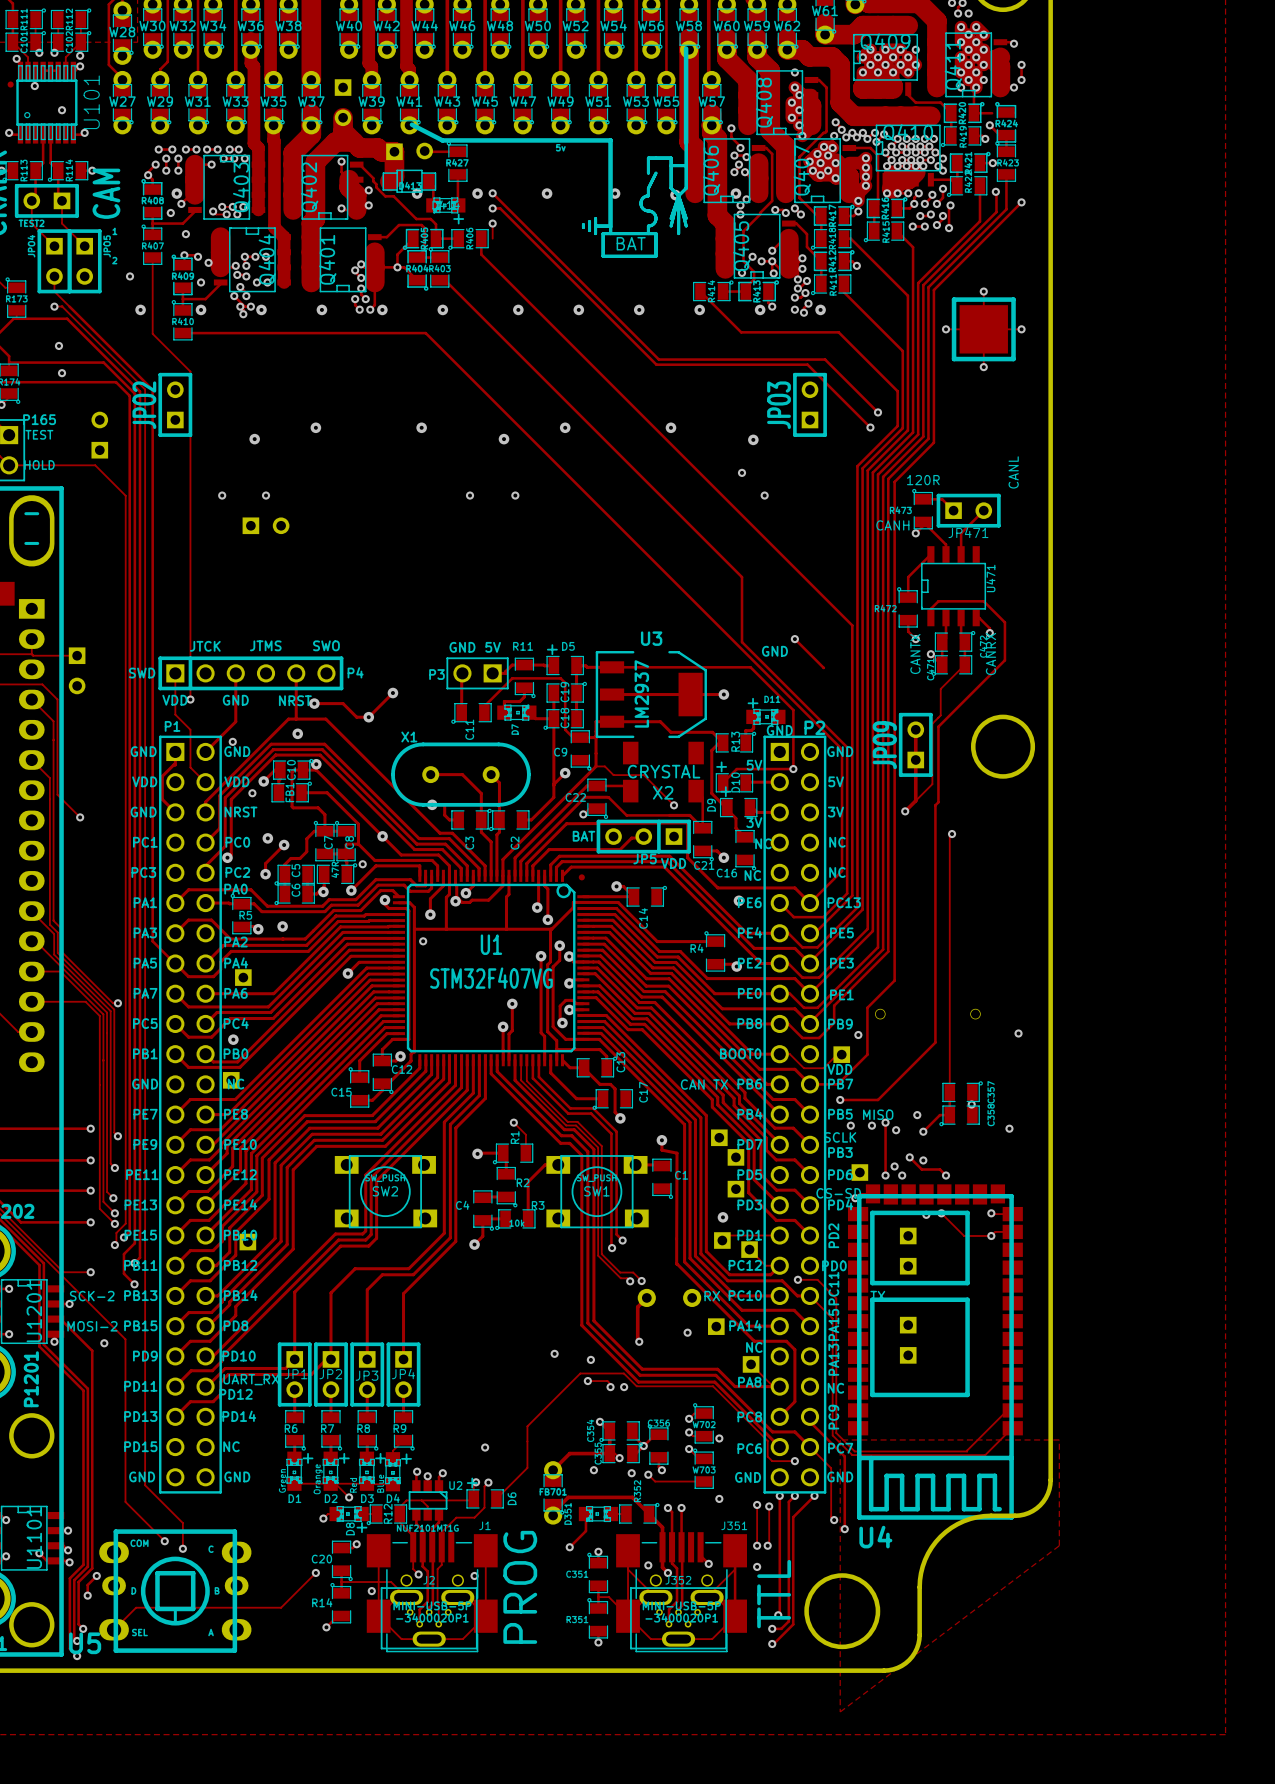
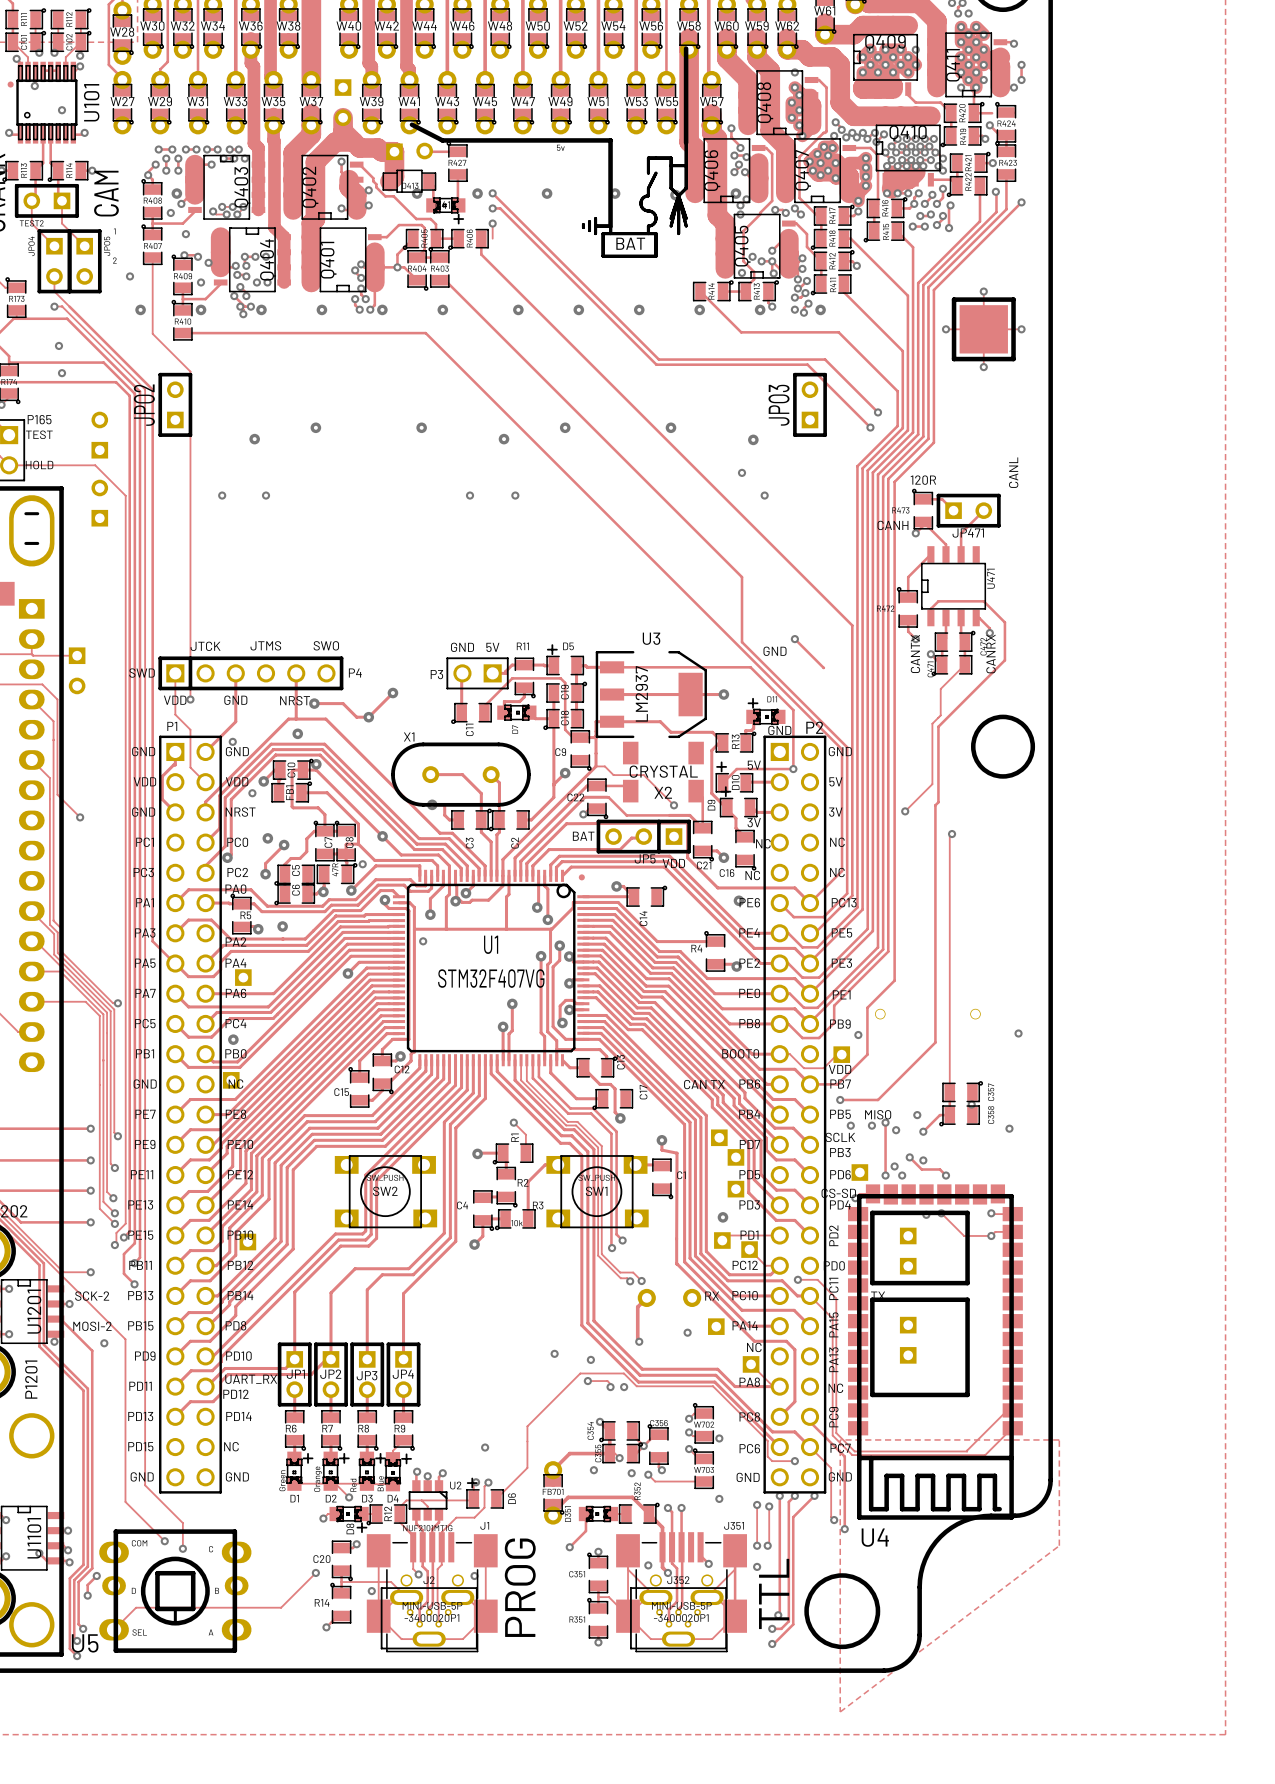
part rotation: 0° (266, 525) -> 90° counterclockwise (99, 503)
part position: (266, 525) -> (99, 503)
track: (915, 729) (915, 800) (905, 811) -> none
JPO9: (915, 744) -> none

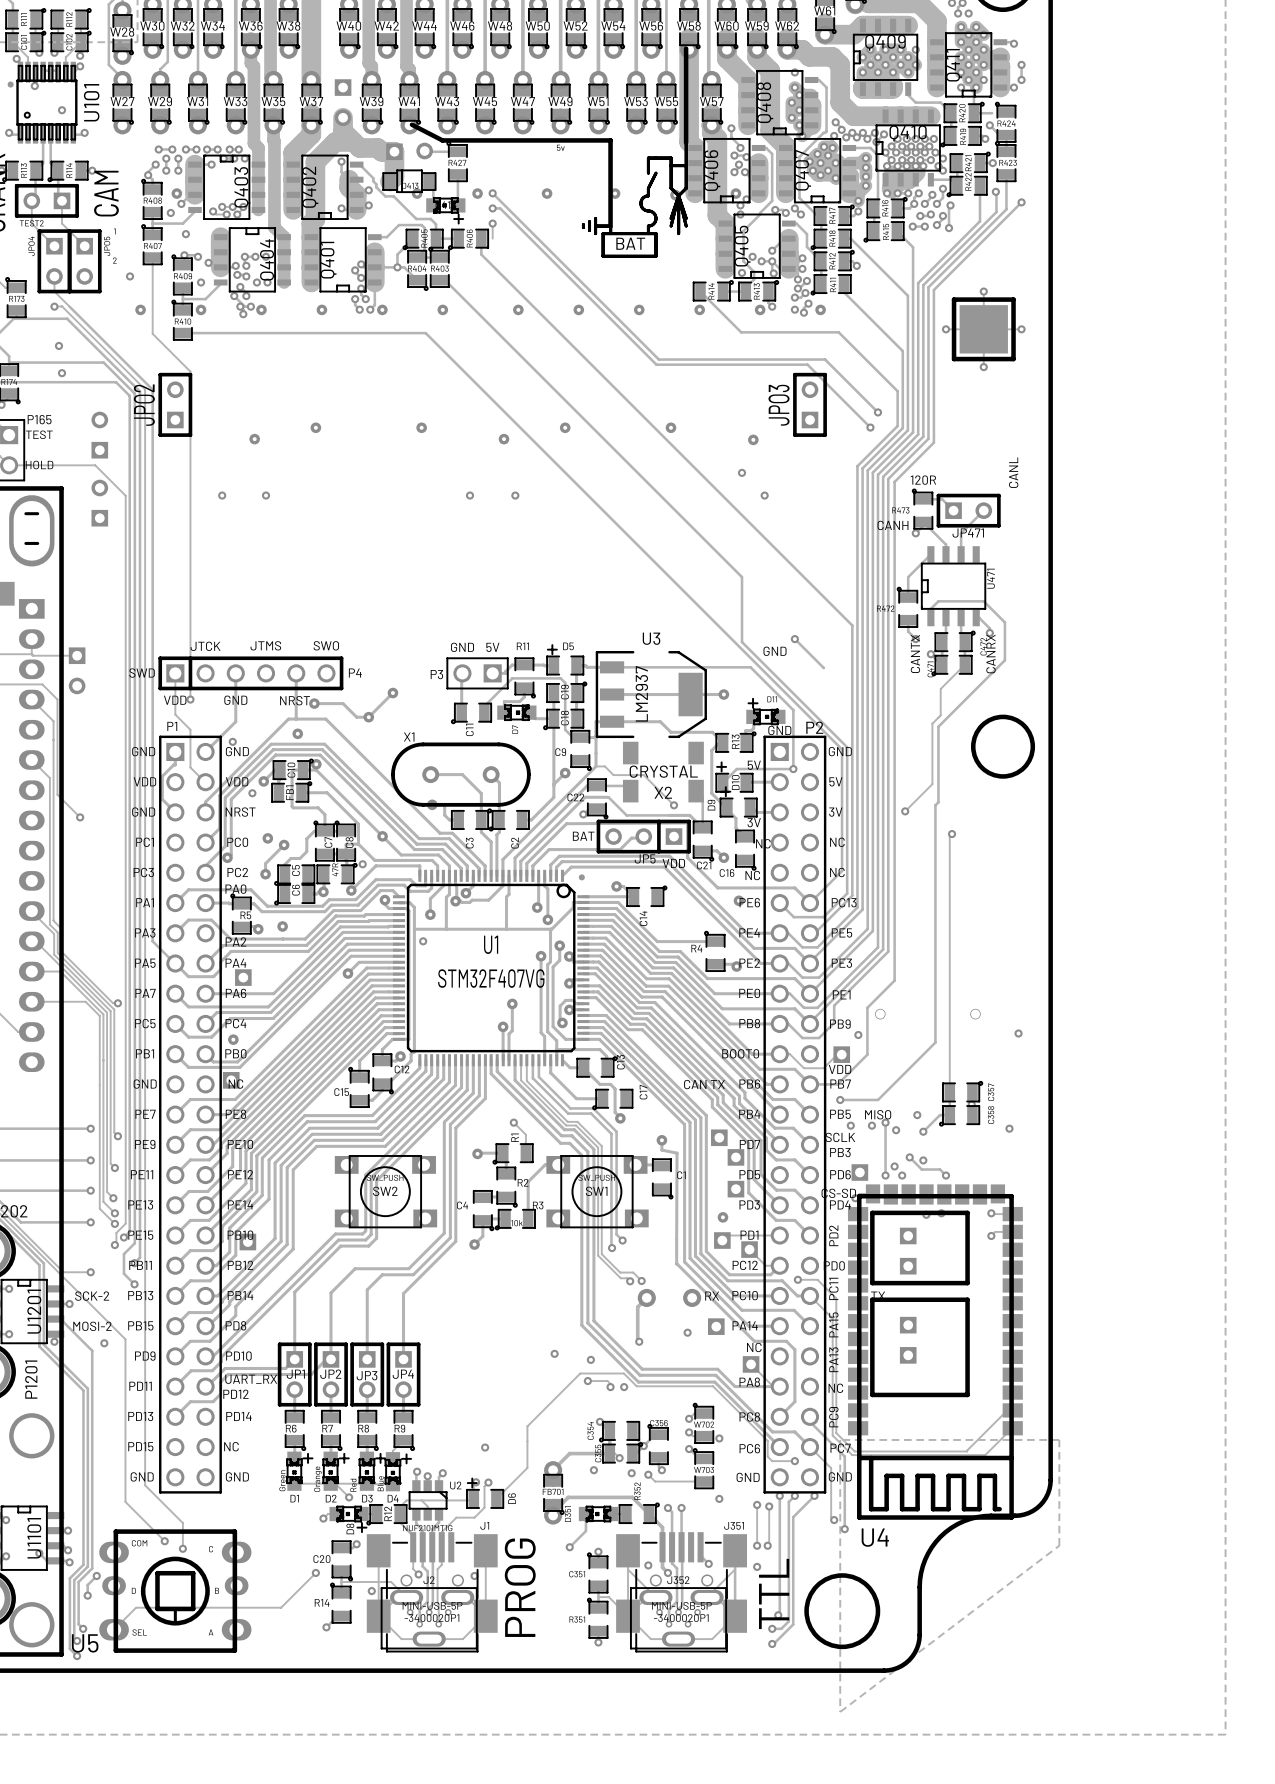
track: (941, 1213) (964, 1235) (991, 1235) -> none

